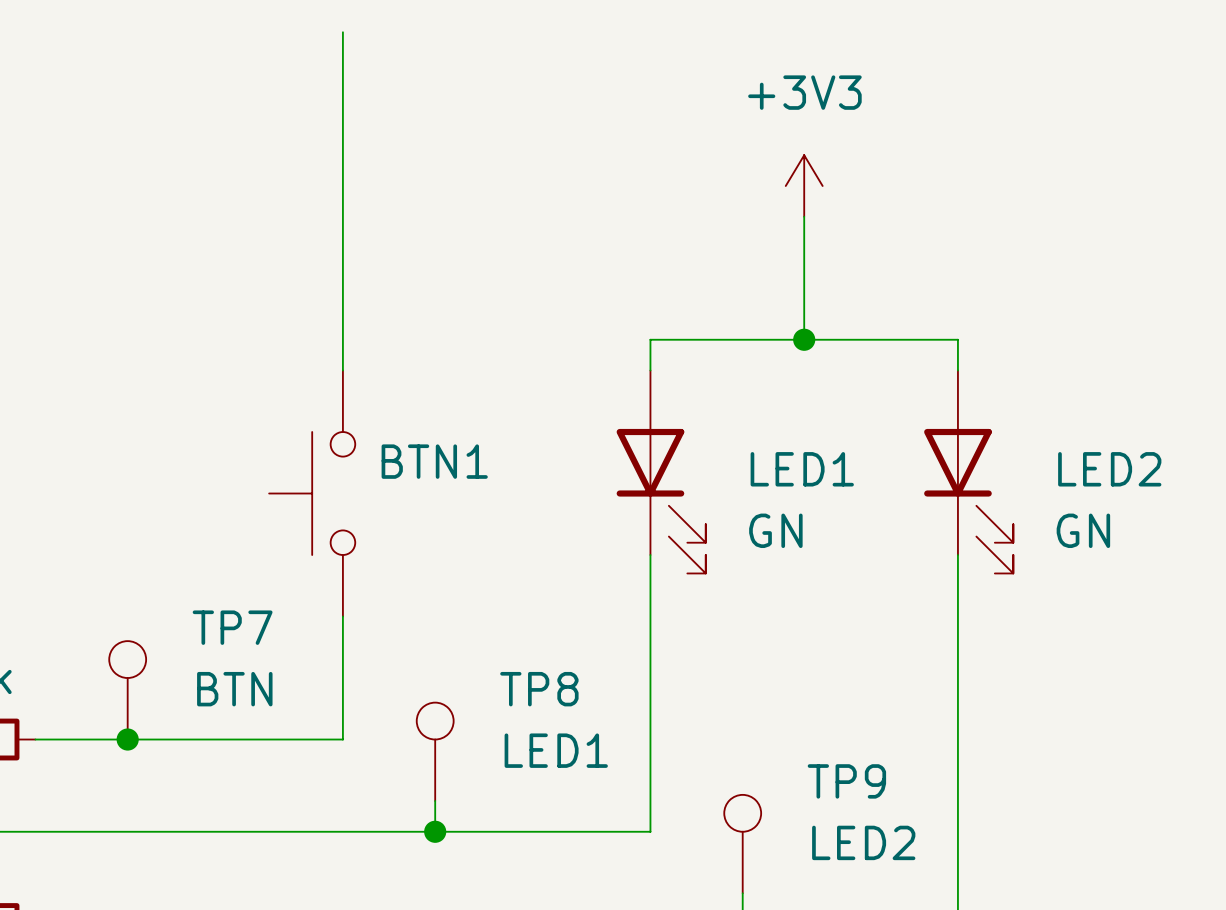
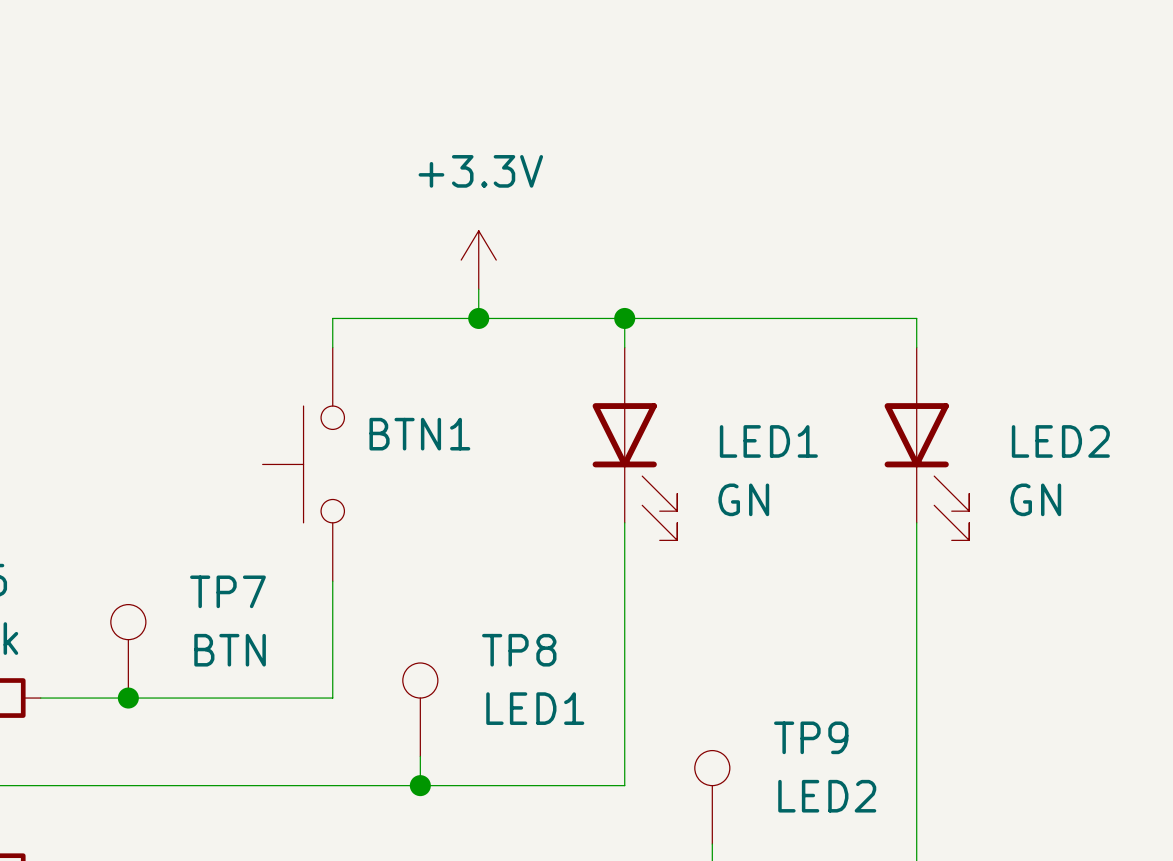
wire: (342, 32) (342, 339) -> (624, 318) (332, 318)
power symbol: +3V3 (804, 186) -> none
wire: (804, 216) (804, 339) -> none
power symbol: none -> +3.3V (478, 260)
wire: none -> (478, 289) (478, 318)
junction: none -> (478, 318)
junction: none -> (624, 318)
junction: (804, 339) -> none

